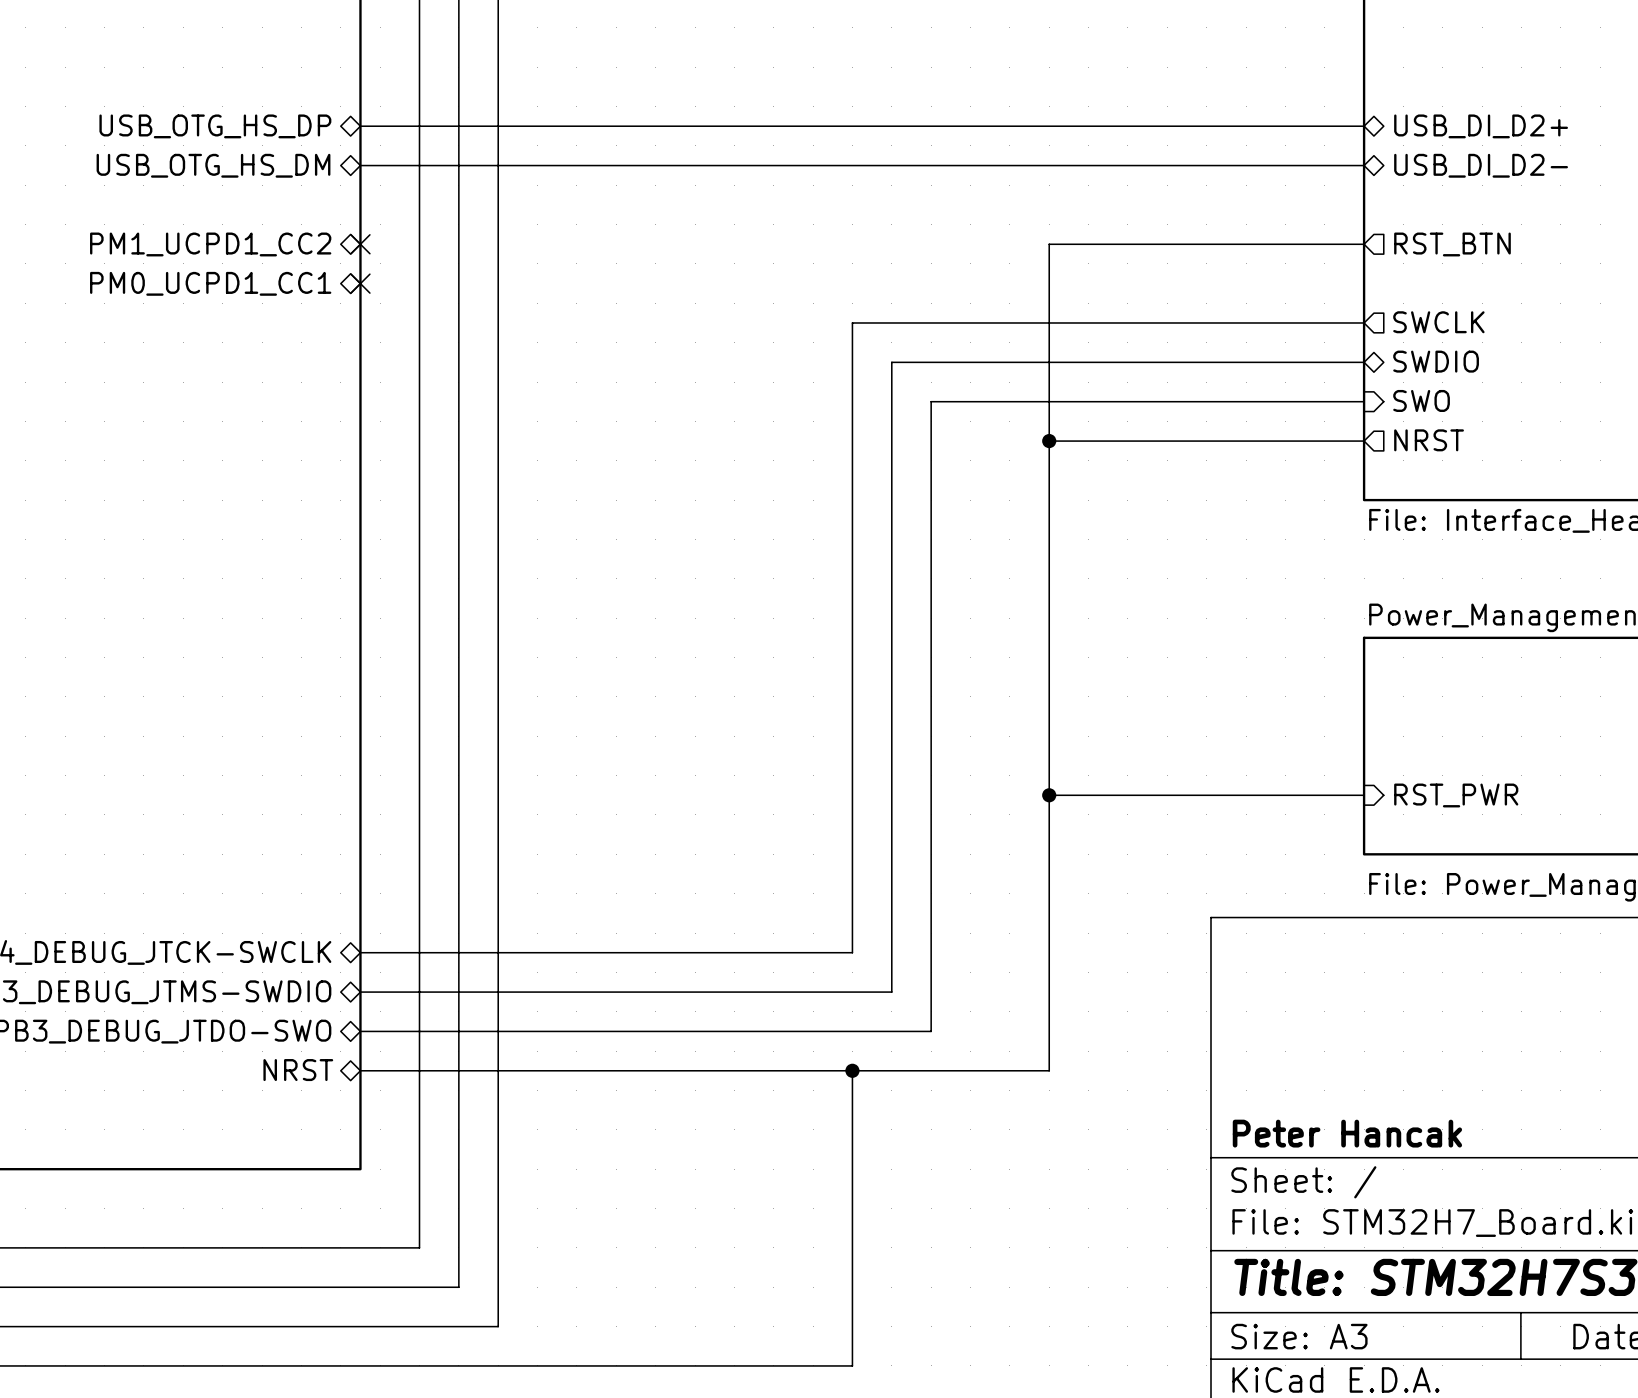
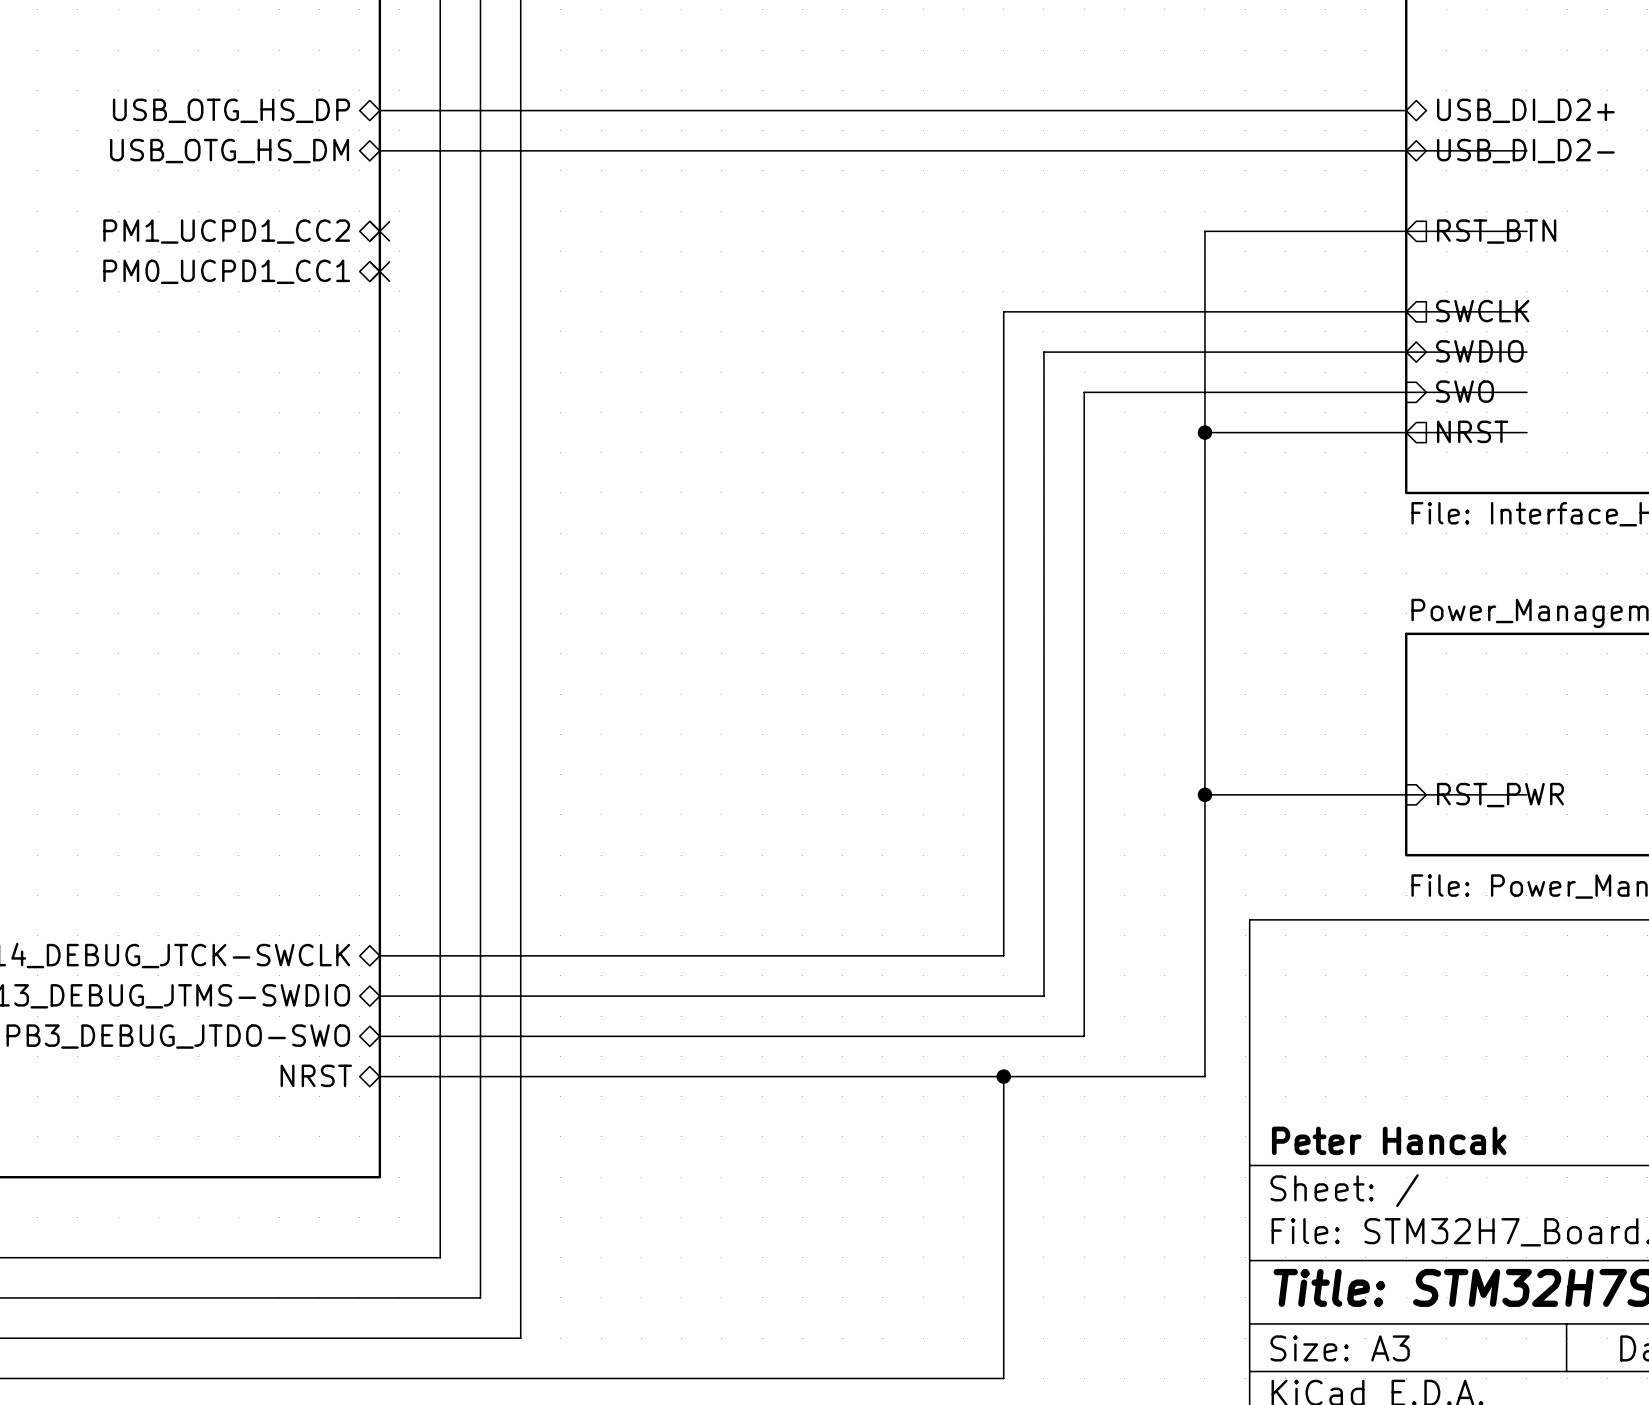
wire: none -> (1406, 150) (1526, 150)
wire: (1167, 244) (1049, 244) (1049, 401) (931, 401) (931, 1031) -> (1204, 231) (1204, 1076) (1084, 1076)
wire: none -> (1406, 231) (1526, 231)
wire: (970, 322) (852, 322) (852, 952) -> (1003, 311) (1003, 955) (882, 955)
wire: none -> (1406, 311) (1526, 311)
wire: (1009, 362) (891, 362) (891, 992) -> (1043, 352) (1043, 996) (923, 996)
wire: none -> (1406, 352) (1526, 352)
wire: none -> (1406, 392) (1526, 392)
wire: (1049, 441) (1167, 441) -> (1406, 432) (1526, 432)
junction: (1049, 441) -> none
junction: none -> (1204, 432)
wire: (1049, 795) (1167, 795) -> (1406, 794) (1526, 794)
junction: (1049, 795) -> none
junction: none -> (1204, 794)
wire: (1049, 1031) (1049, 1070) -> (1084, 1036) (963, 1036)
wire: (852, 1070) (852, 1365) -> (1003, 1076) (1003, 1378) (882, 1378)
junction: (852, 1070) -> none
junction: none -> (1003, 1076)

